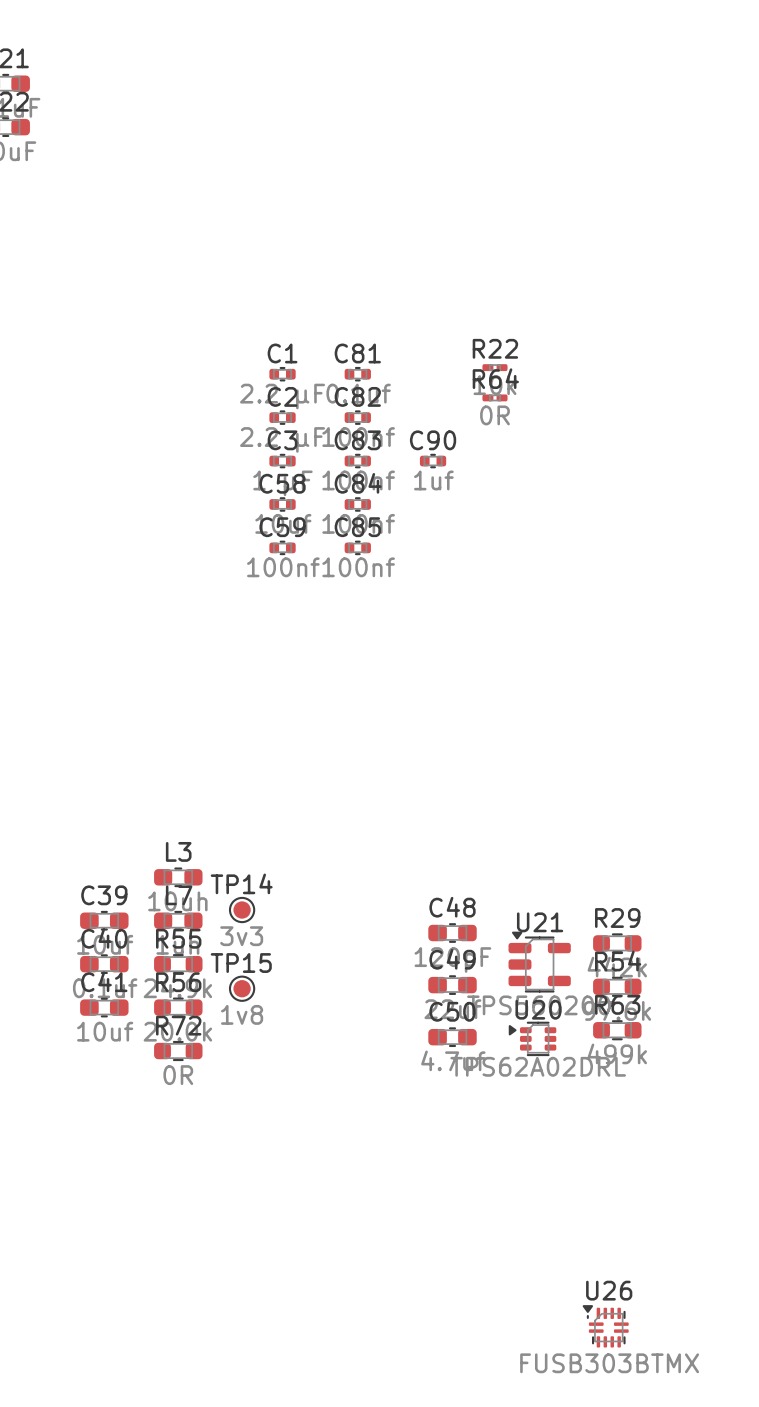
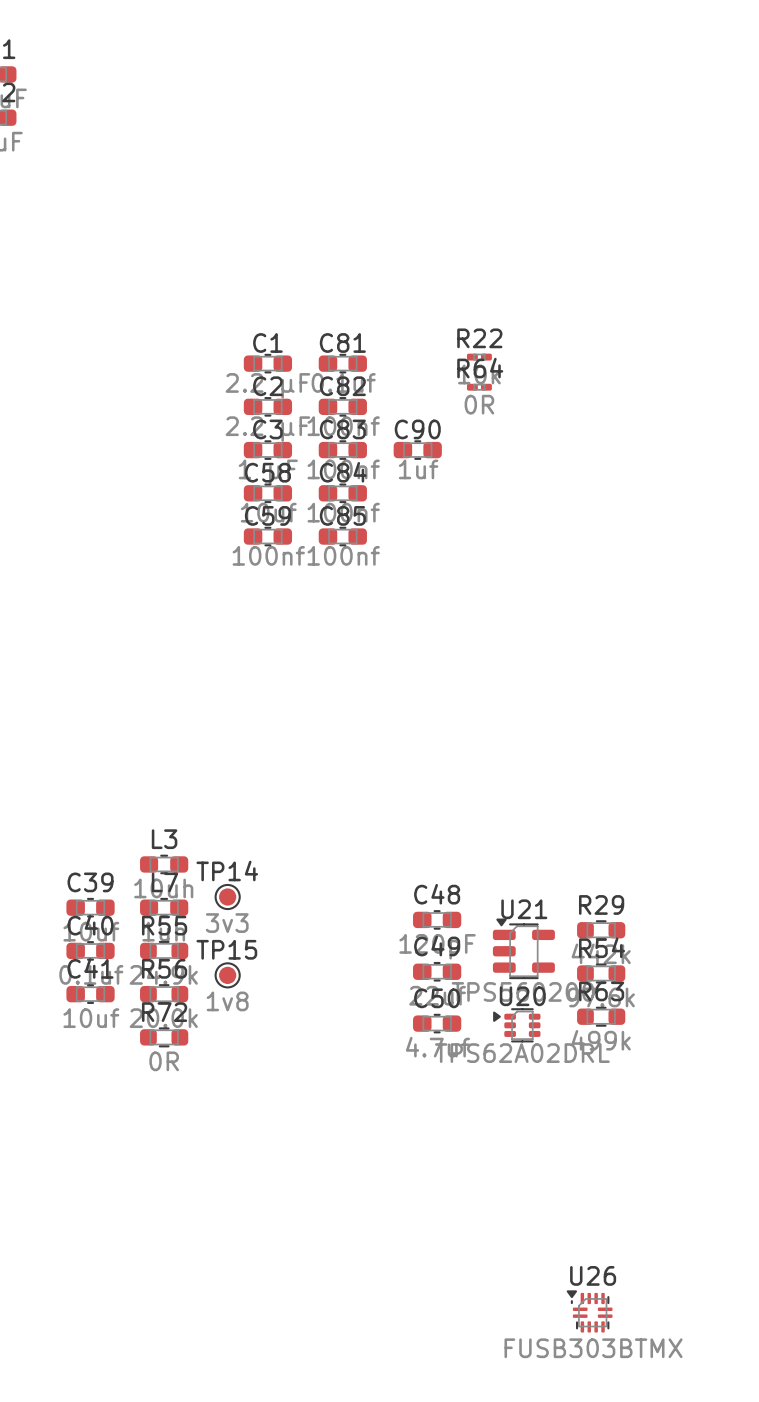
C1 footprint: [269, 366, 296, 382] -> [243, 353, 293, 374]
C81 footprint: [344, 366, 371, 382] -> [318, 353, 367, 374]
C2 footprint: [269, 410, 296, 425] -> [243, 397, 293, 417]
C82 footprint: [344, 410, 371, 425] -> [318, 397, 367, 417]
C3 footprint: [269, 453, 296, 469] -> [243, 440, 293, 460]
C83 footprint: [344, 453, 371, 469] -> [318, 440, 367, 460]
C90 footprint: [419, 453, 447, 469] -> [393, 440, 442, 460]
C58 footprint: [269, 497, 296, 512] -> [243, 483, 293, 504]
C84 footprint: [344, 497, 371, 512] -> [318, 483, 367, 504]
C59 footprint: [269, 540, 296, 556] -> [243, 526, 293, 547]
C85 footprint: [344, 540, 371, 556] -> [318, 526, 367, 547]

